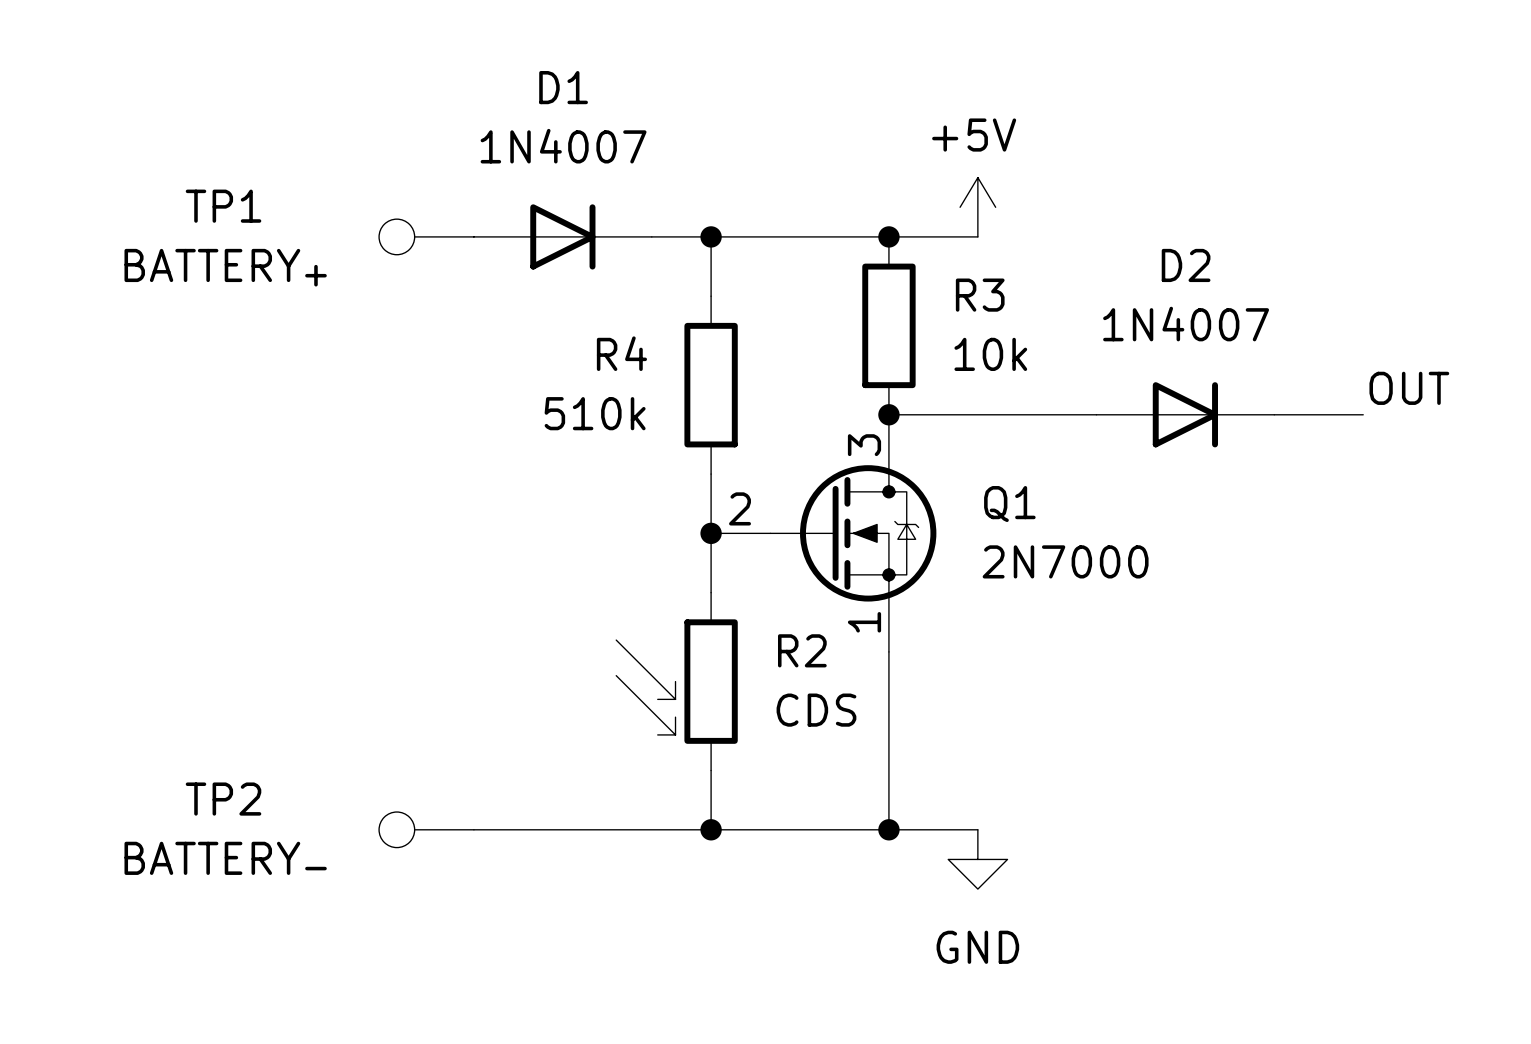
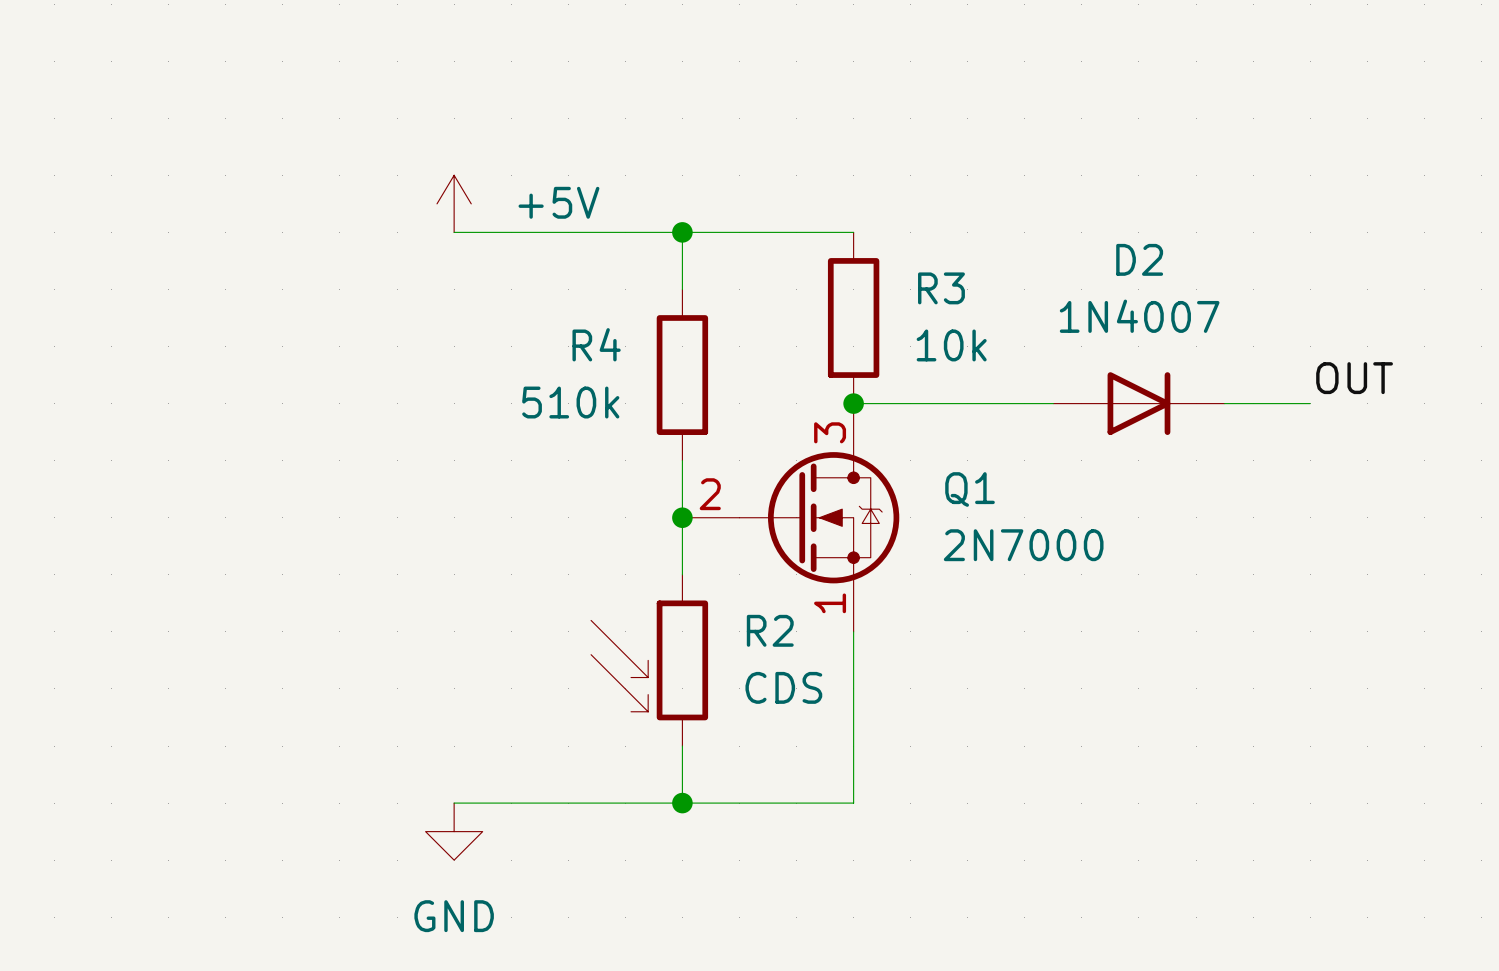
power symbol text position: +5V (974, 135) -> +5V (558, 202)
power symbol position: +5V (977, 207) -> +5V (454, 203)
TP1: BATTERY+ (426, 236) -> none
D1: 1N4007 (562, 236) -> none
wire: (888, 236) (977, 236) -> none
junction: (888, 236) -> none
TP2: BATTERY- (426, 829) -> none
wire: (888, 829) (977, 829) -> none
junction: (888, 829) -> none
power symbol position: GND (977, 859) -> GND (454, 831)

